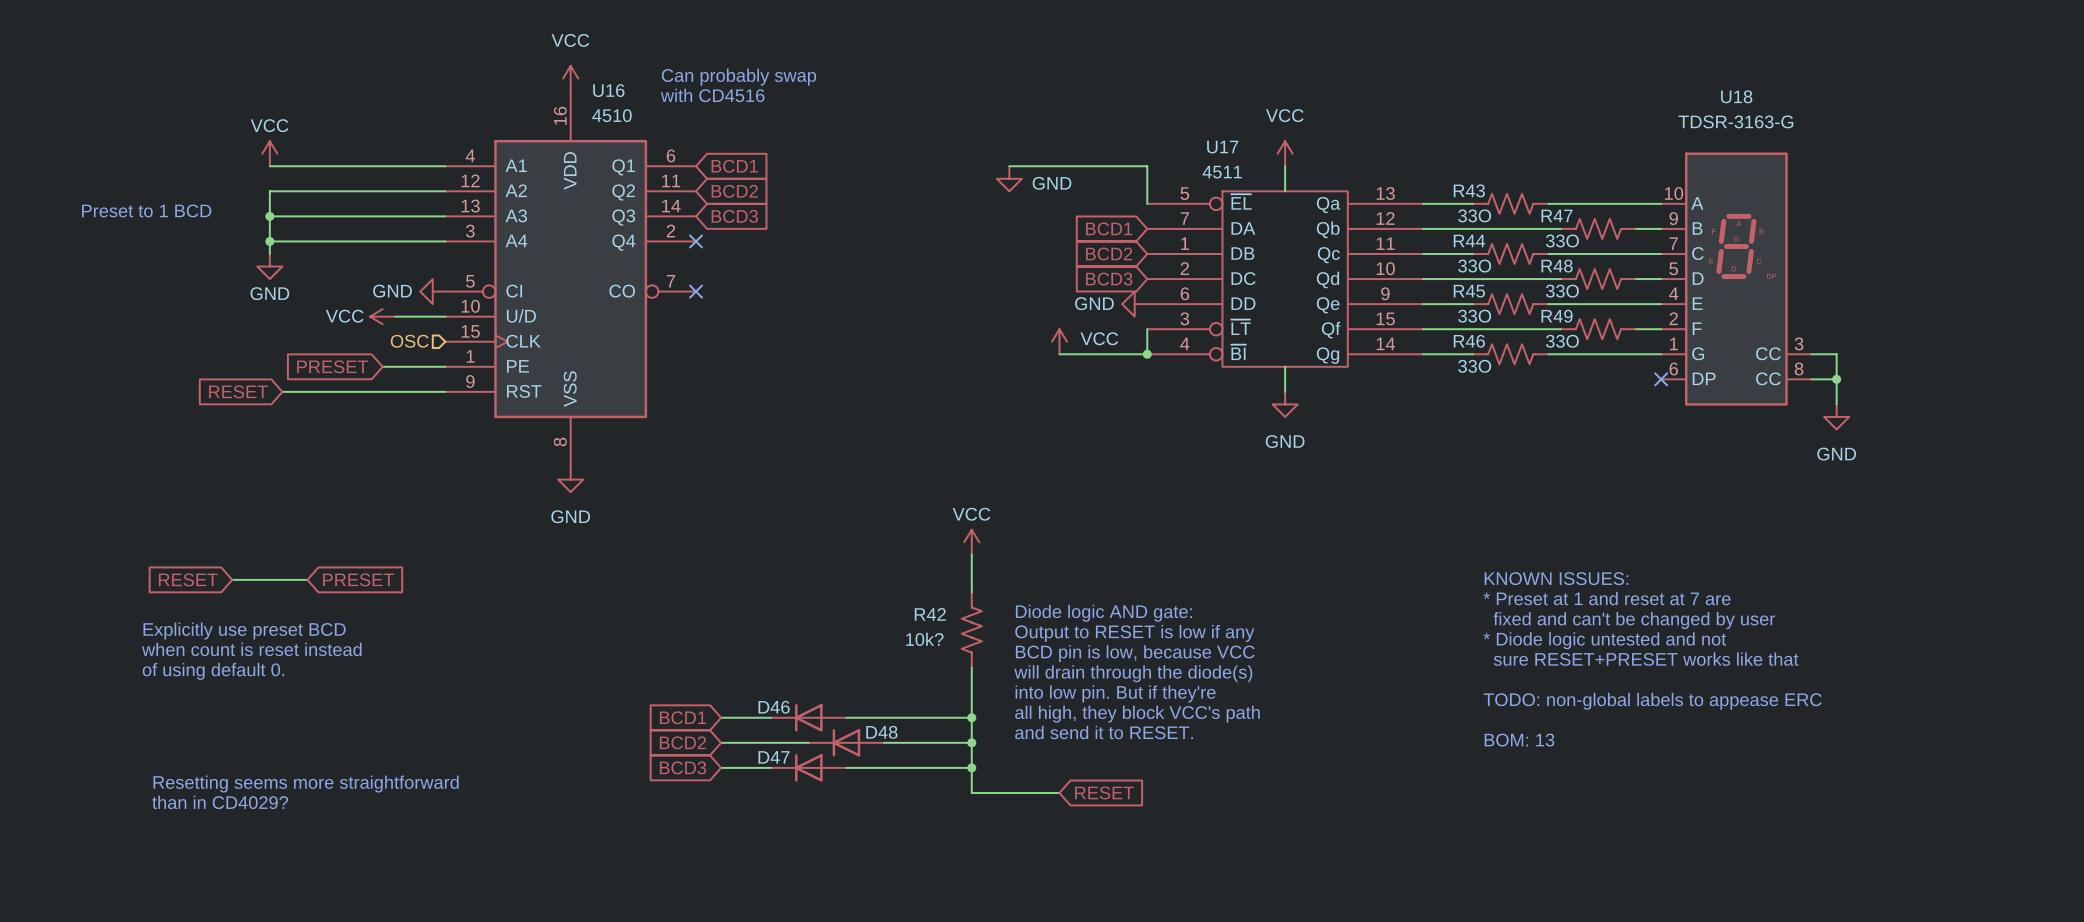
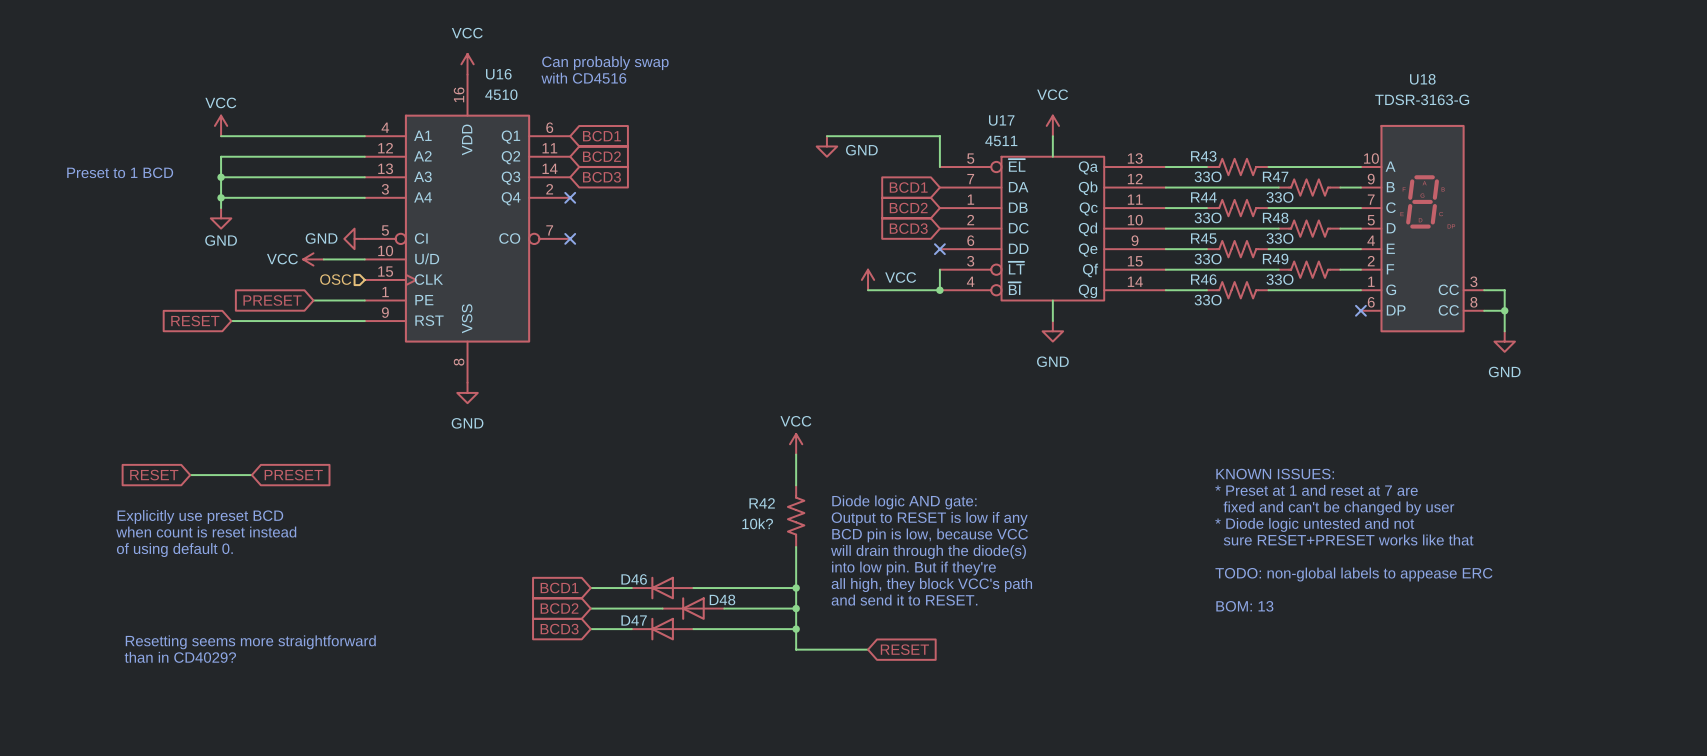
power symbol: GND (1134, 304) -> none
no-connect mark: none -> (939, 249)

